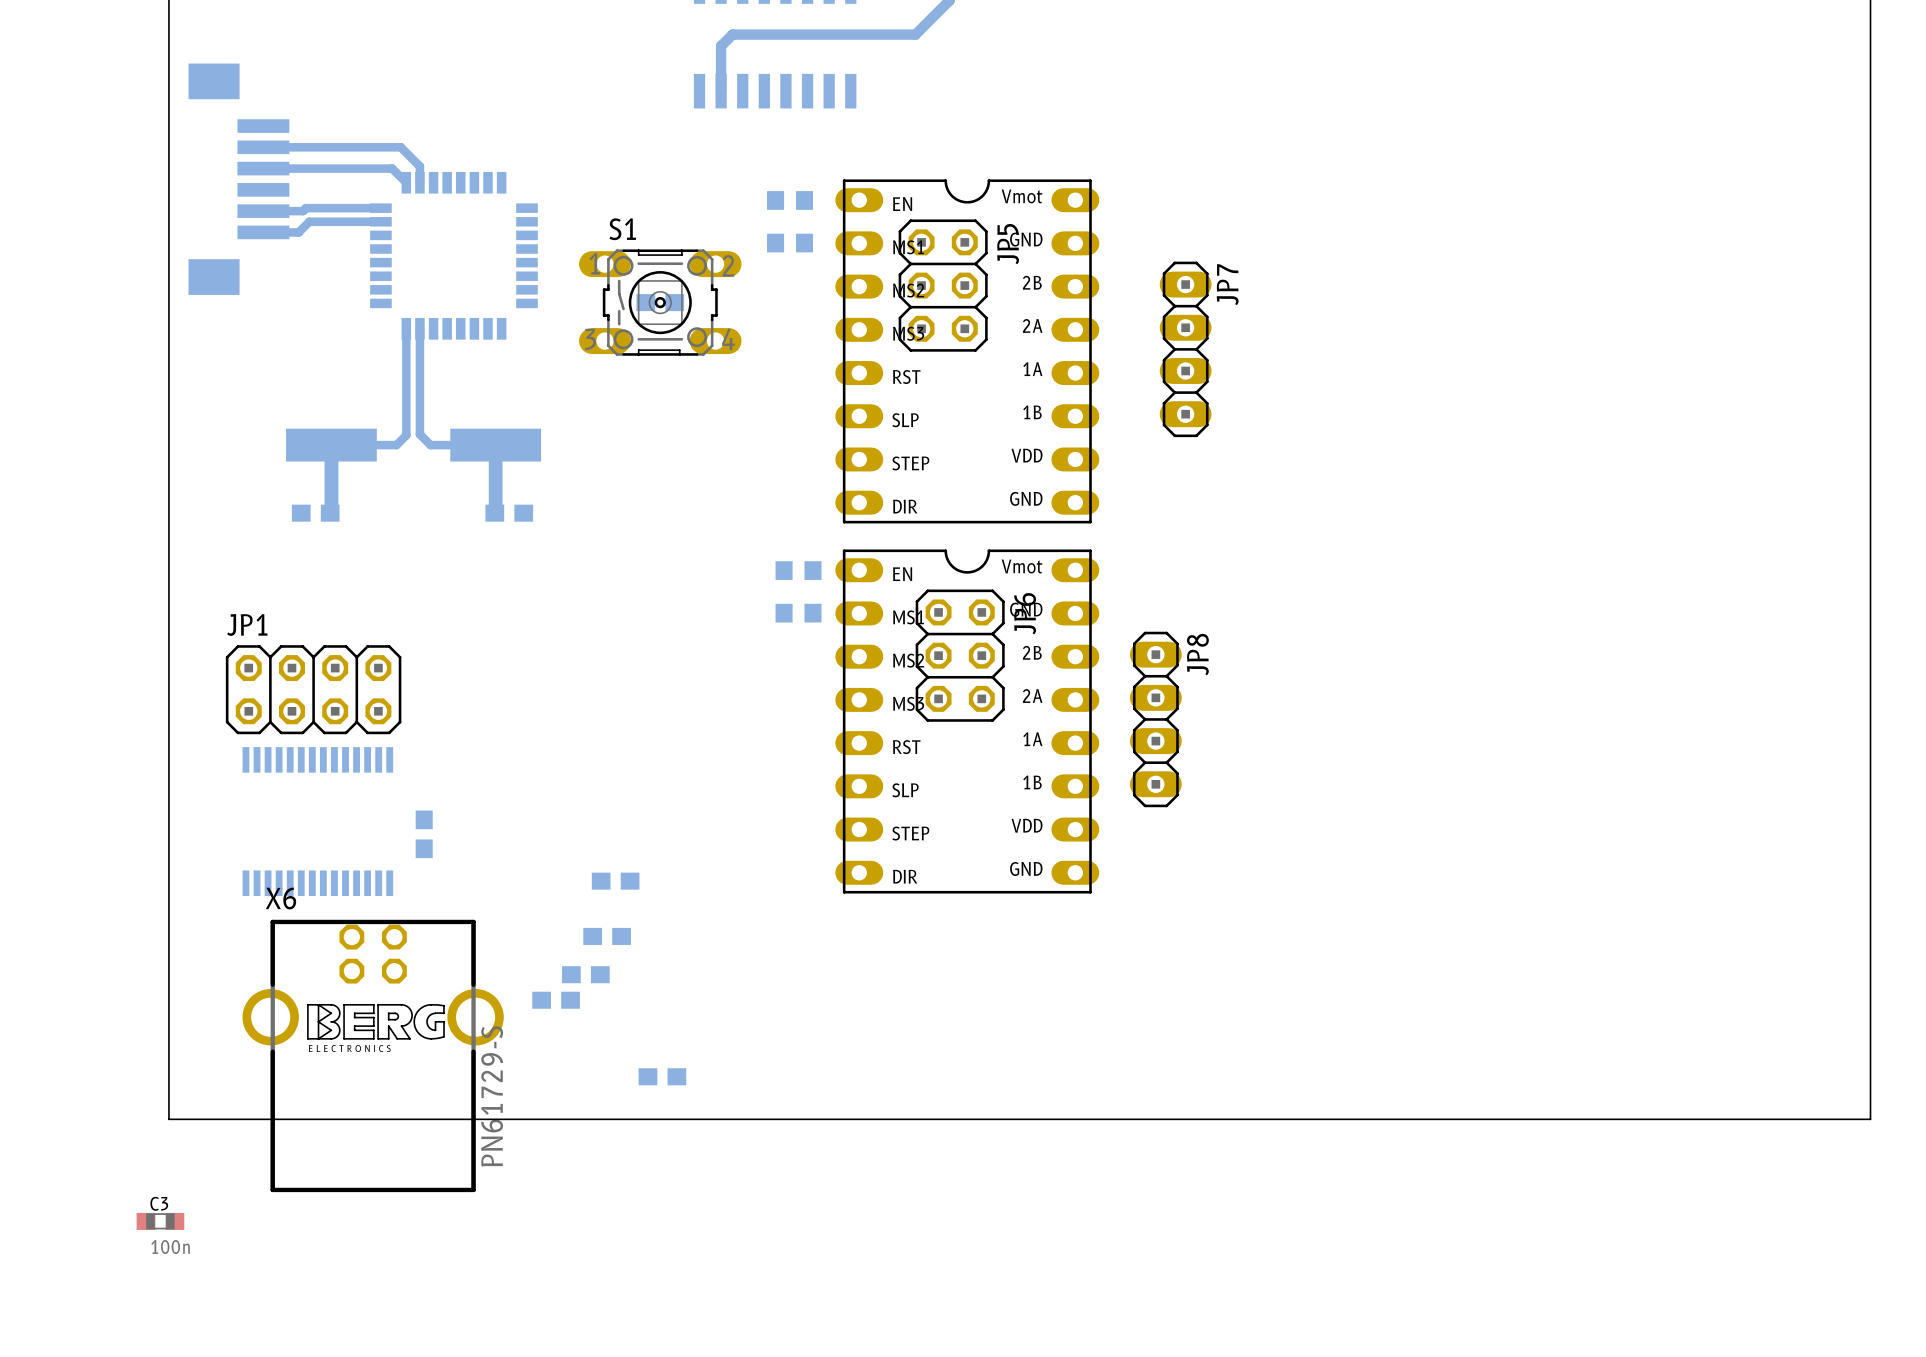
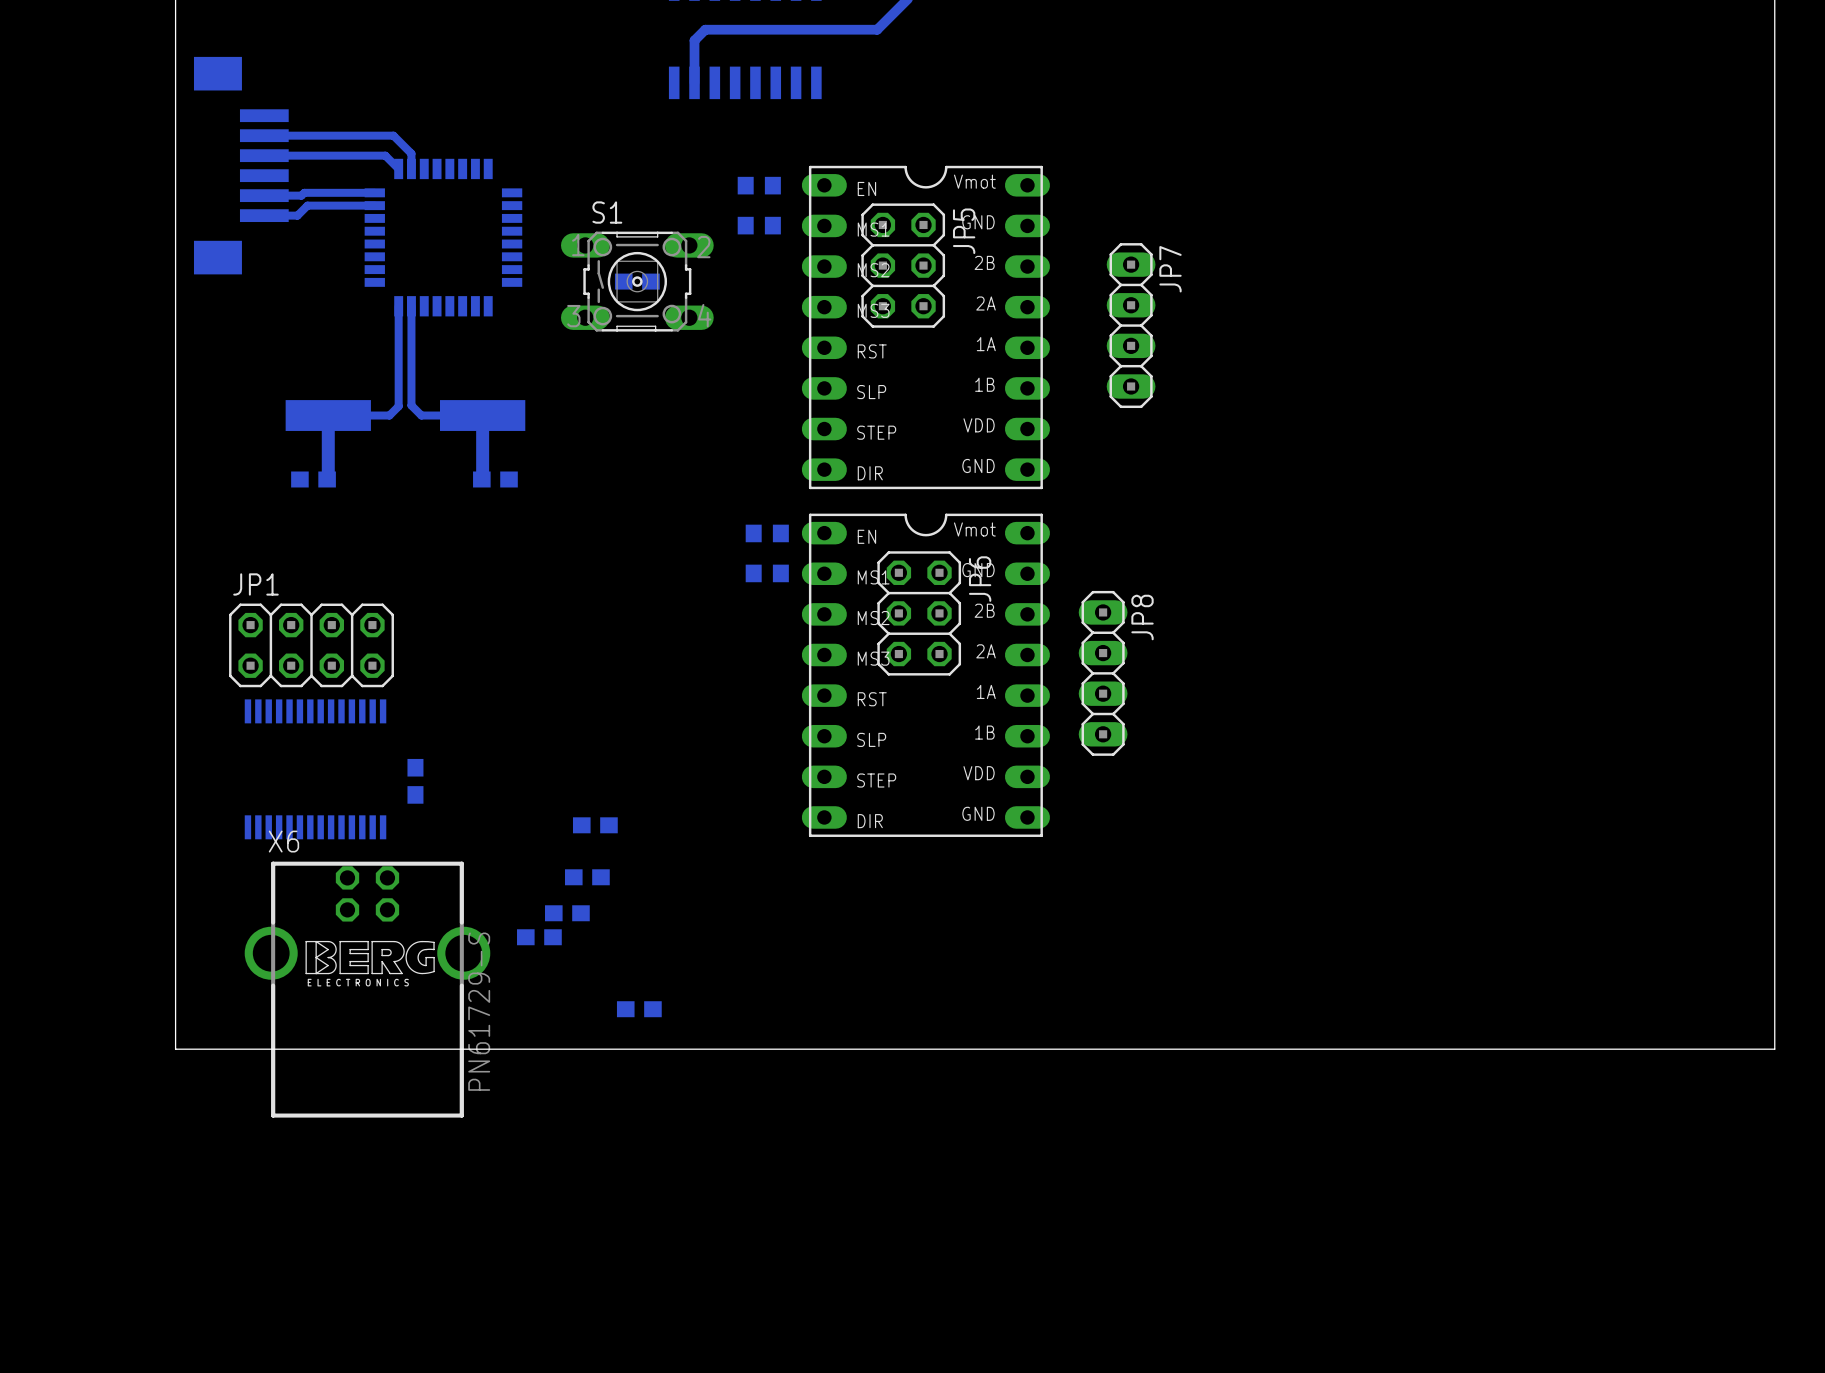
C3: 100n (160, 1221) -> none

